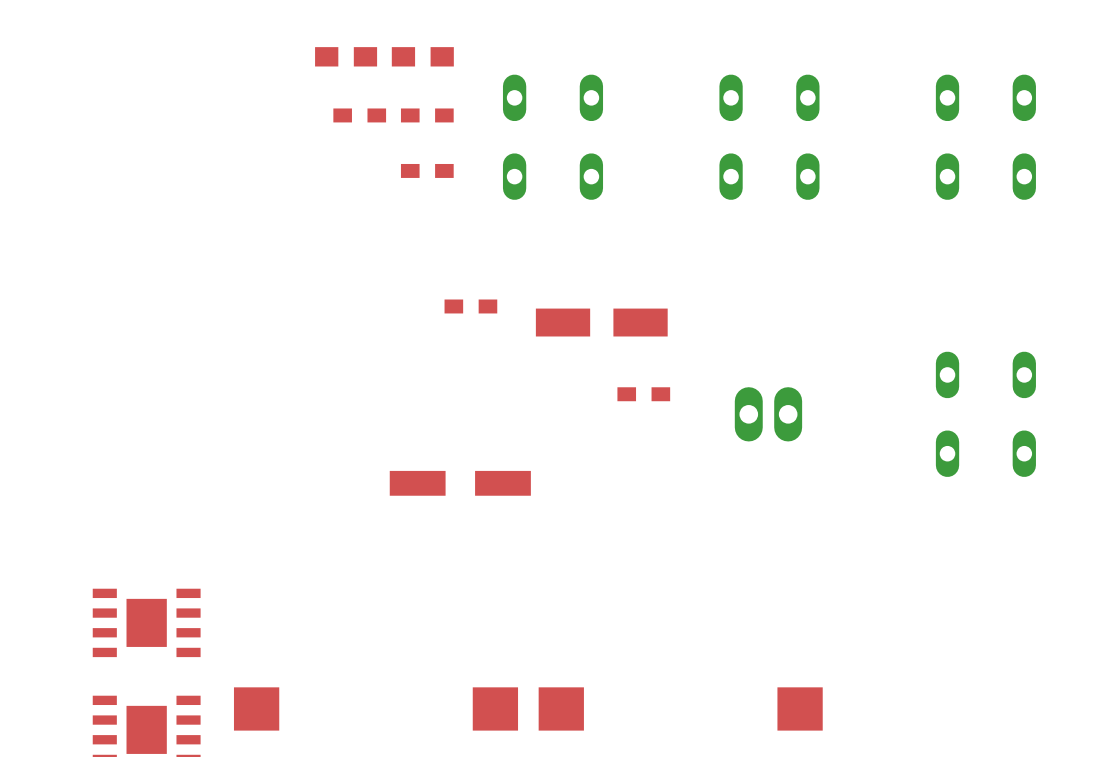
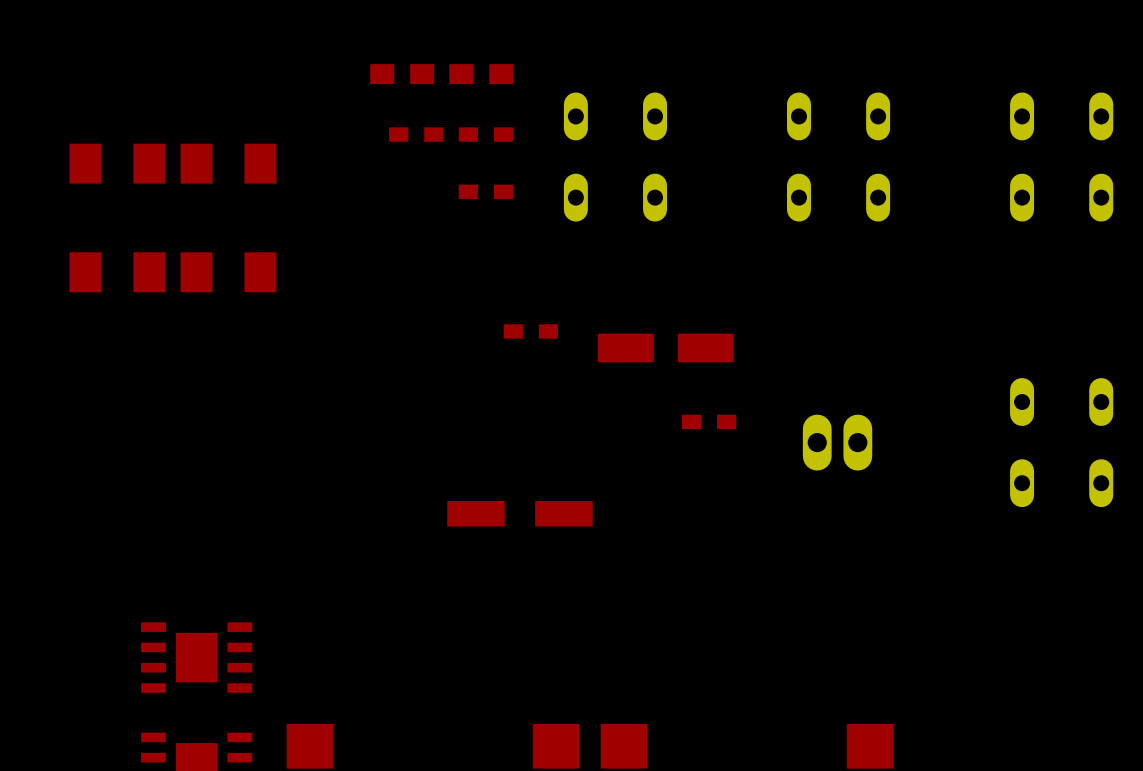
part: none -> (117, 163)
part: none -> (228, 163)
part: none -> (117, 272)
part: none -> (228, 272)

